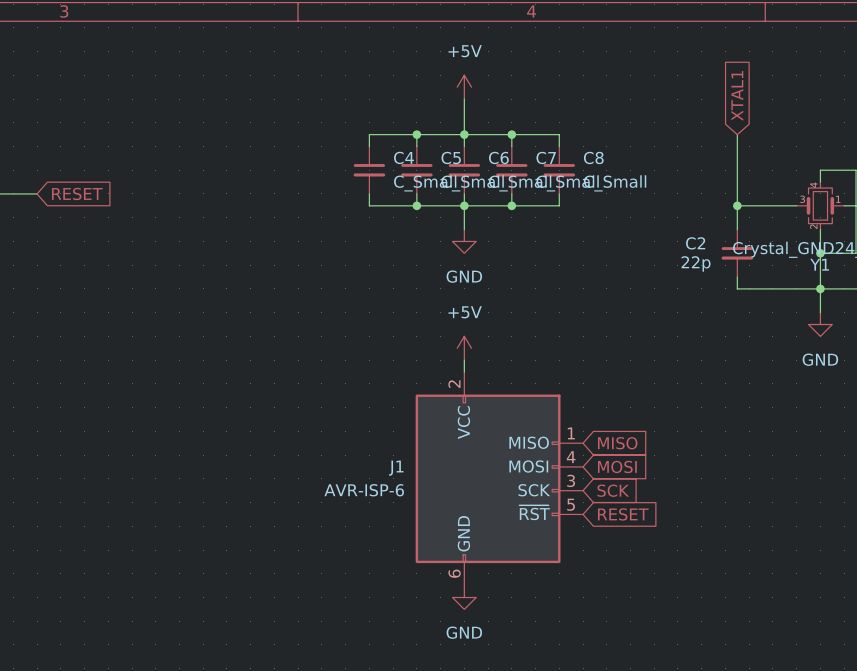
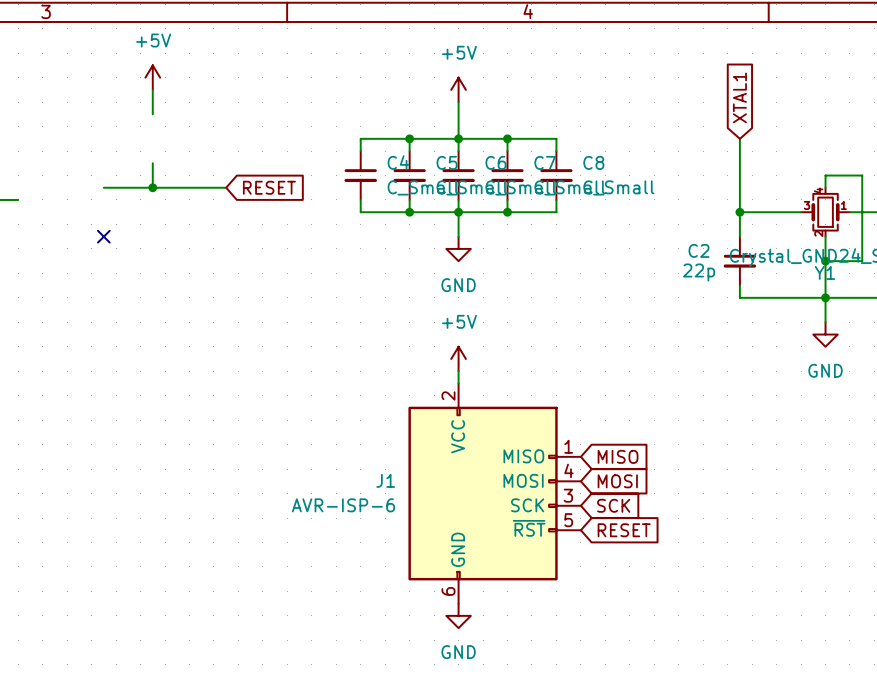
power symbol: none -> +5V (152, 77)
wire: none -> (152, 89) (152, 114)
wire: none -> (152, 163) (152, 187)
wire: none -> (103, 187) (226, 187)
junction: none -> (152, 187)
global label position: RESET (77, 193) -> RESET (269, 187)
no-connect mark: none -> (103, 236)

